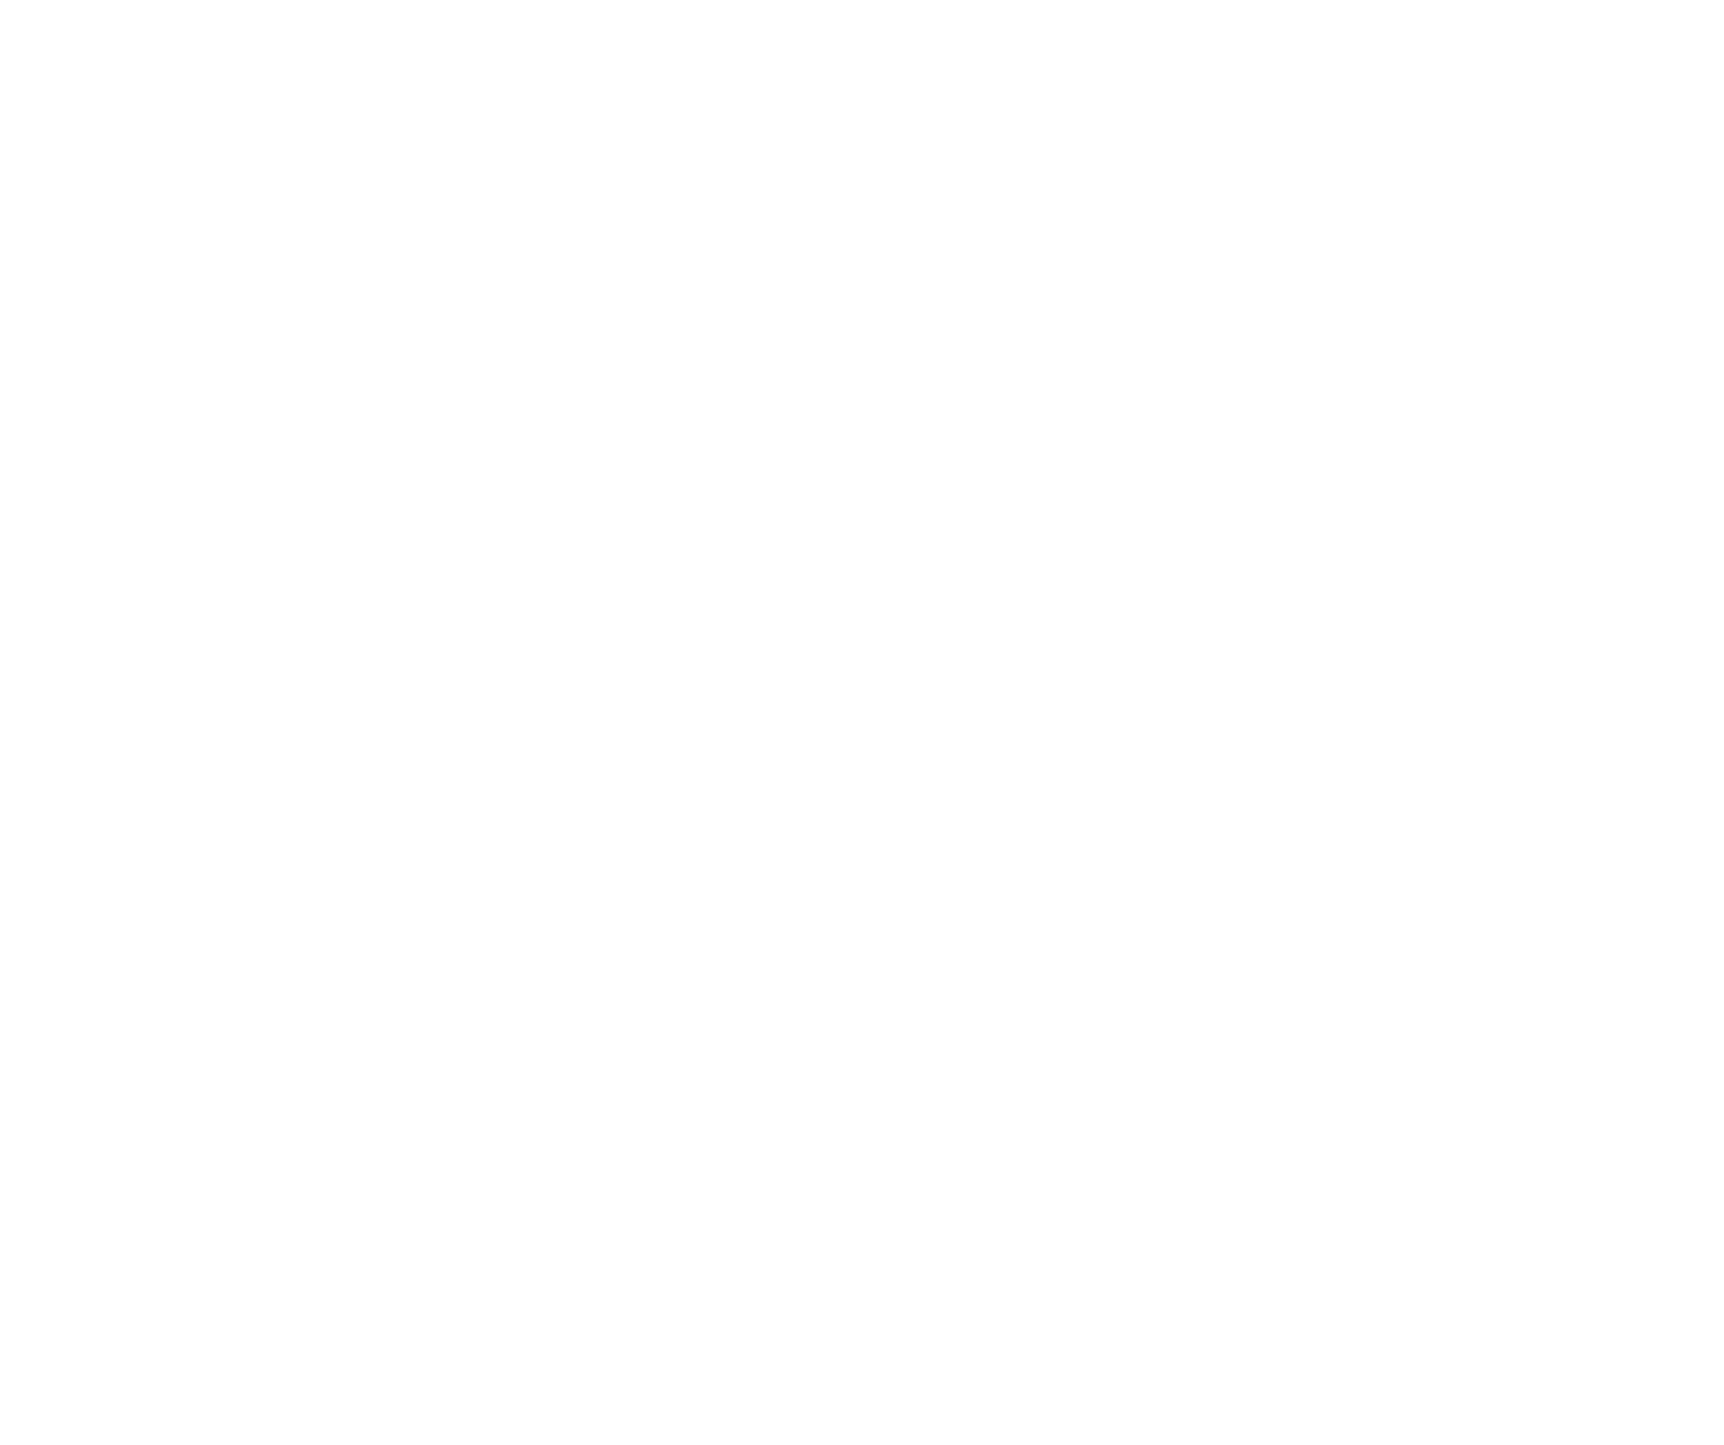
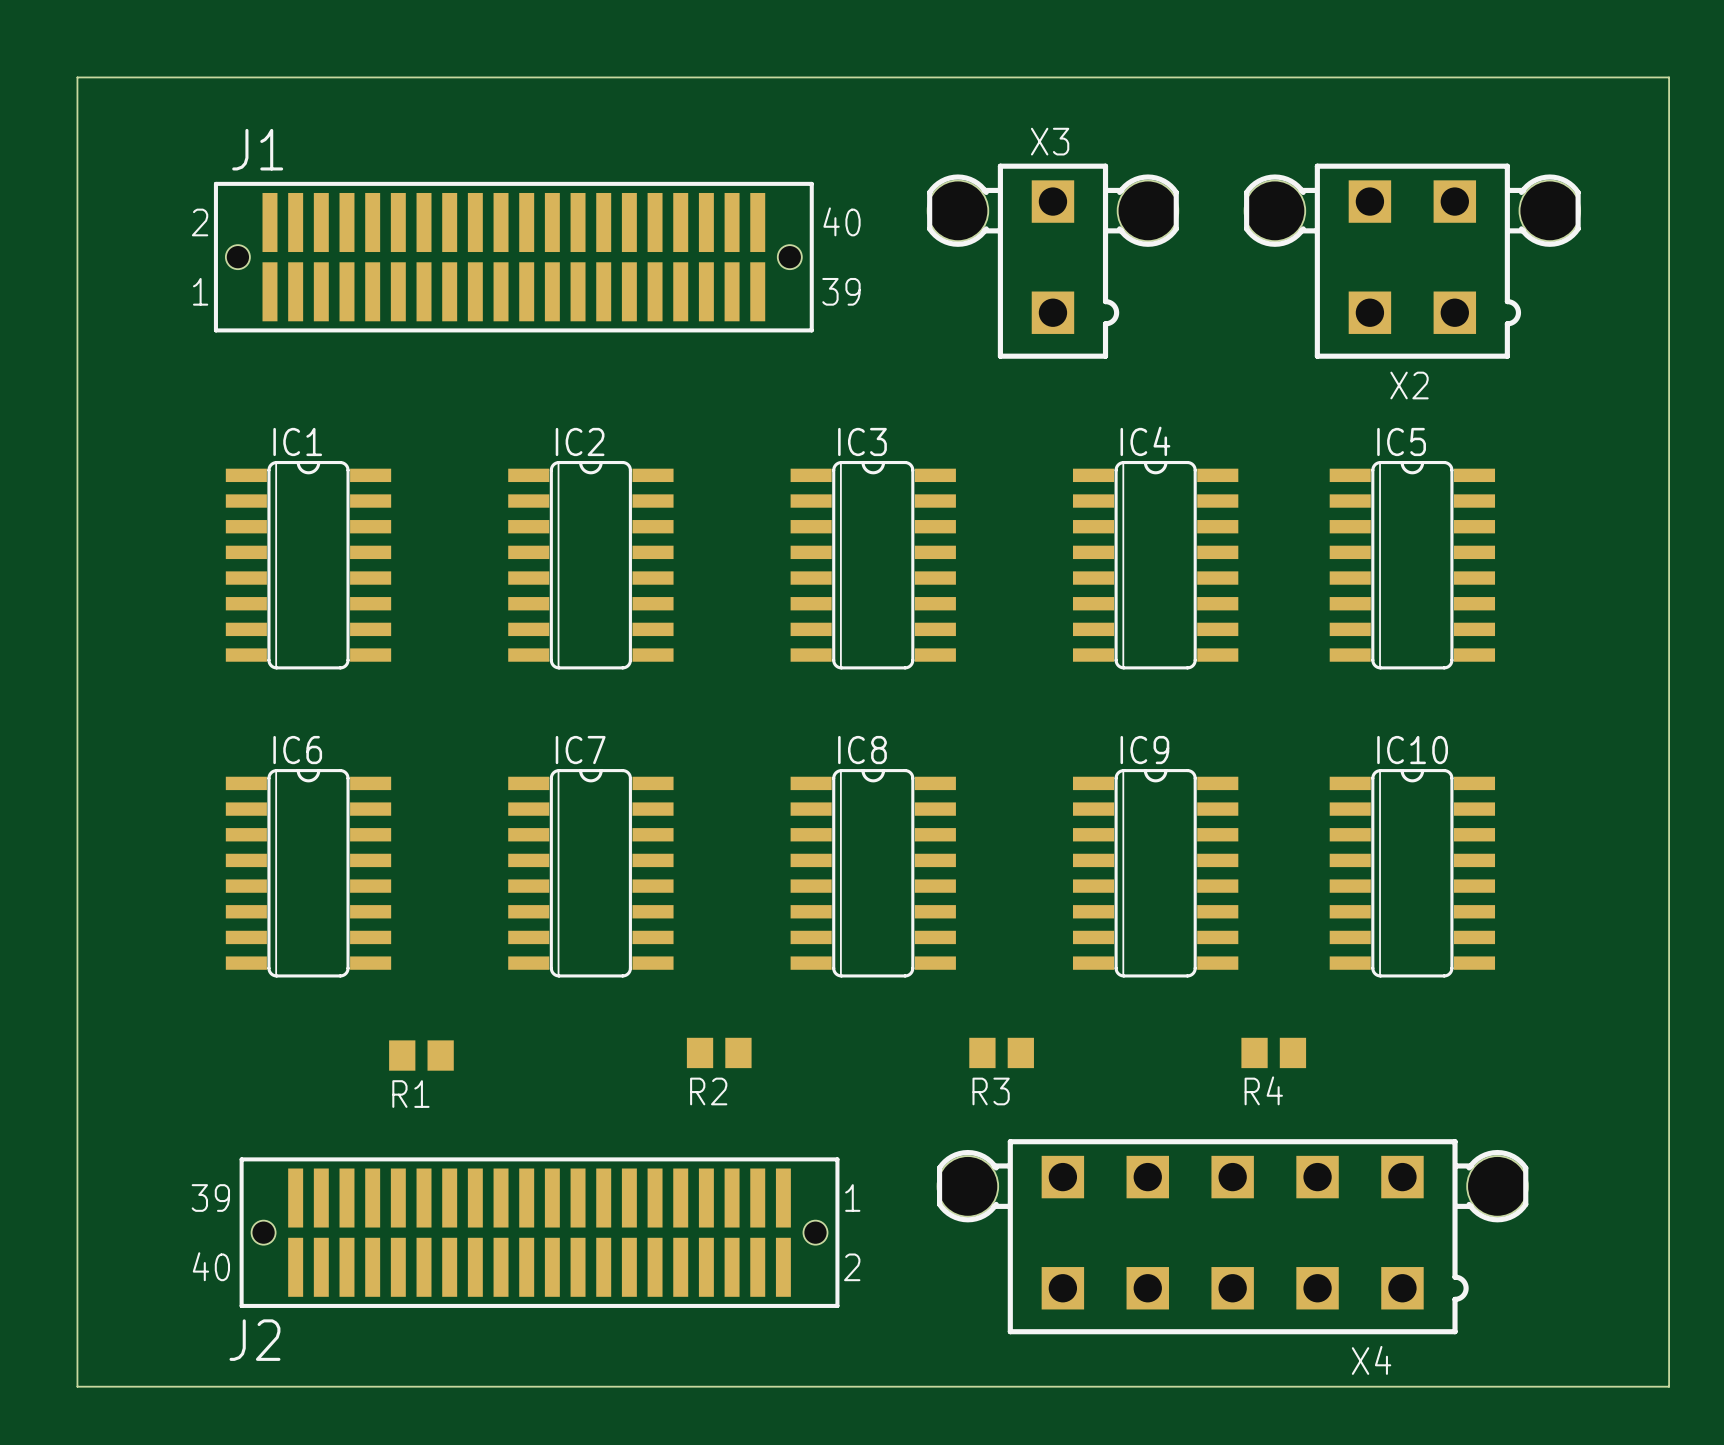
board edge: none -> (77, 77) (1669, 77) (1669, 1386) (77, 1386) (77, 77)
J1: none -> (513, 257)
X3: none -> (1052, 261)
X2: none -> (1412, 261)
IC1: none -> (308, 565)
IC2: none -> (590, 565)
IC3: none -> (873, 565)
IC4: none -> (1155, 565)
IC5: none -> (1412, 565)
IC6: none -> (308, 873)
IC7: none -> (590, 873)
IC8: none -> (873, 873)
IC9: none -> (1155, 873)
IC10: none -> (1412, 873)
R2: none -> (719, 1052)
R3: none -> (1001, 1052)
R4: none -> (1273, 1052)
R1: none -> (421, 1055)
J2: none -> (539, 1232)
X4: none -> (1232, 1236)

